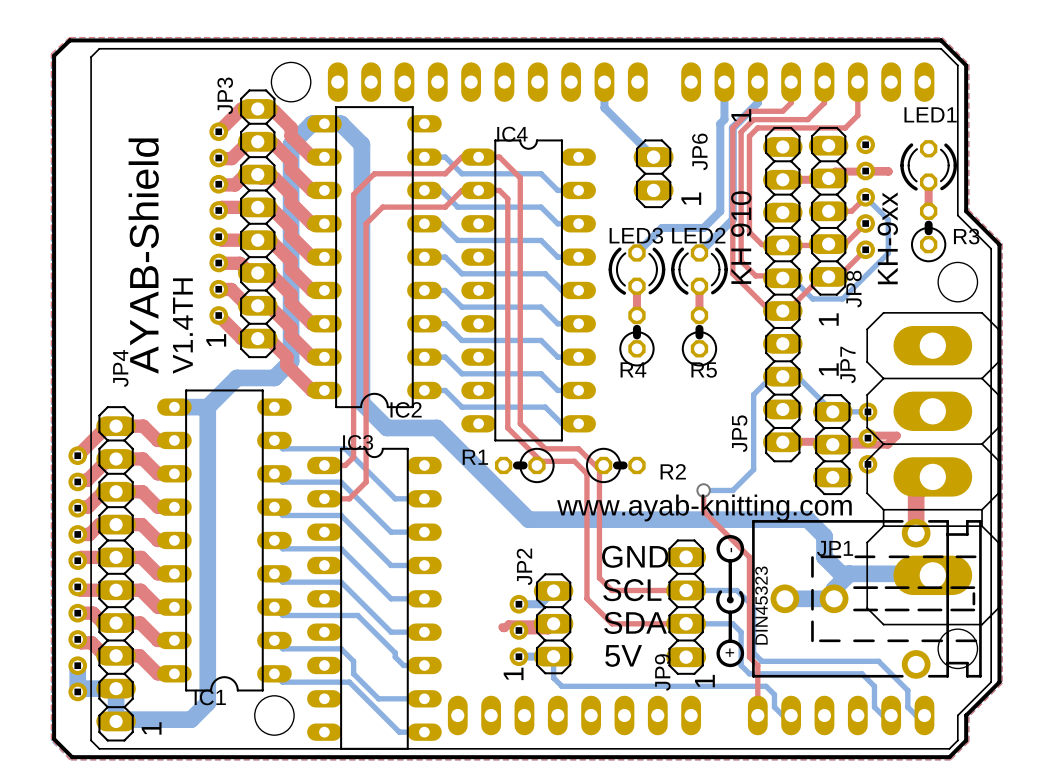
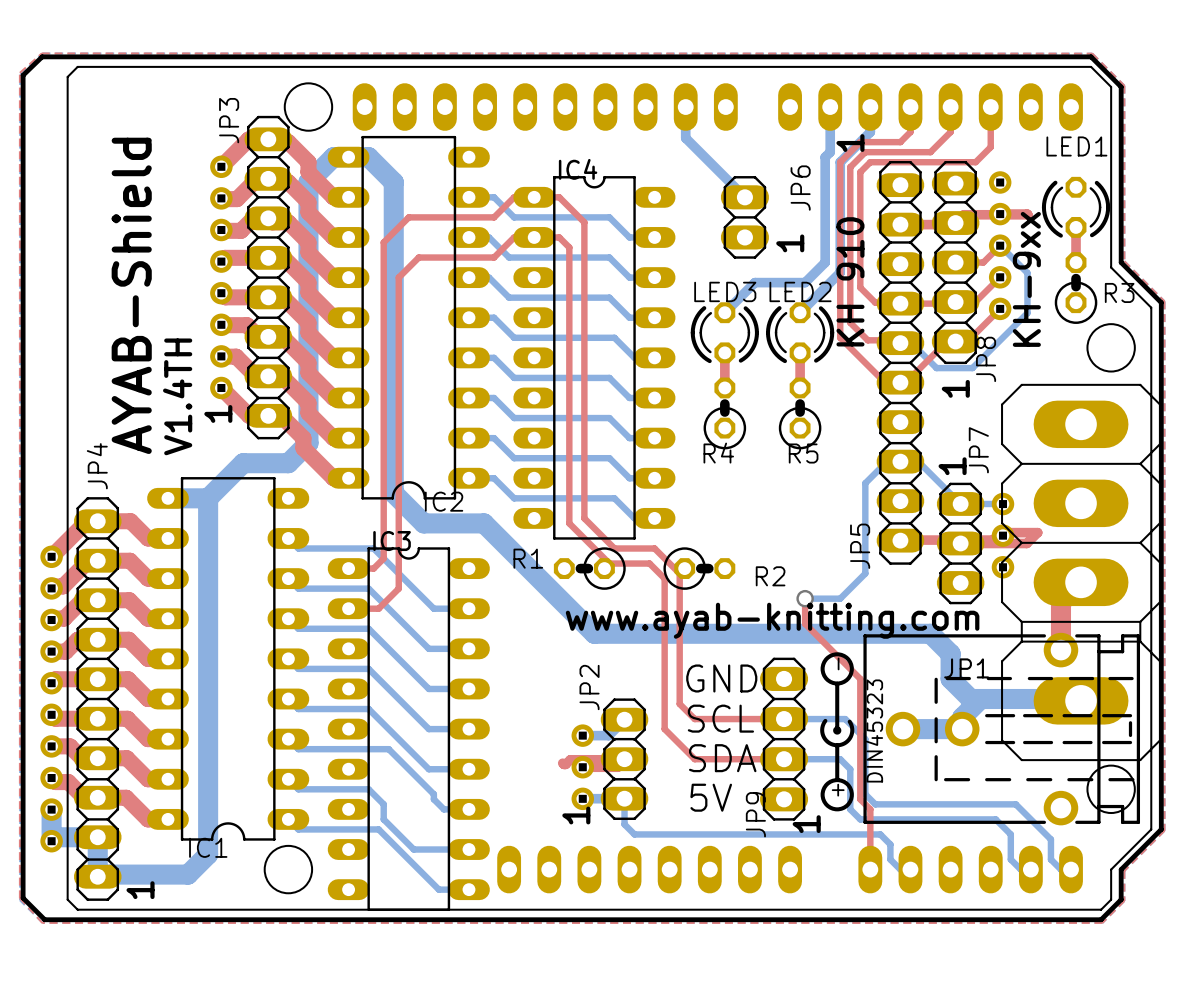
JP4 name position: JP4 (120, 368) -> JP4 (97, 466)
text position: 1 (828, 369) -> 1 (952, 466)
JP5 name position: JP5 (739, 433) -> JP5 (860, 546)

